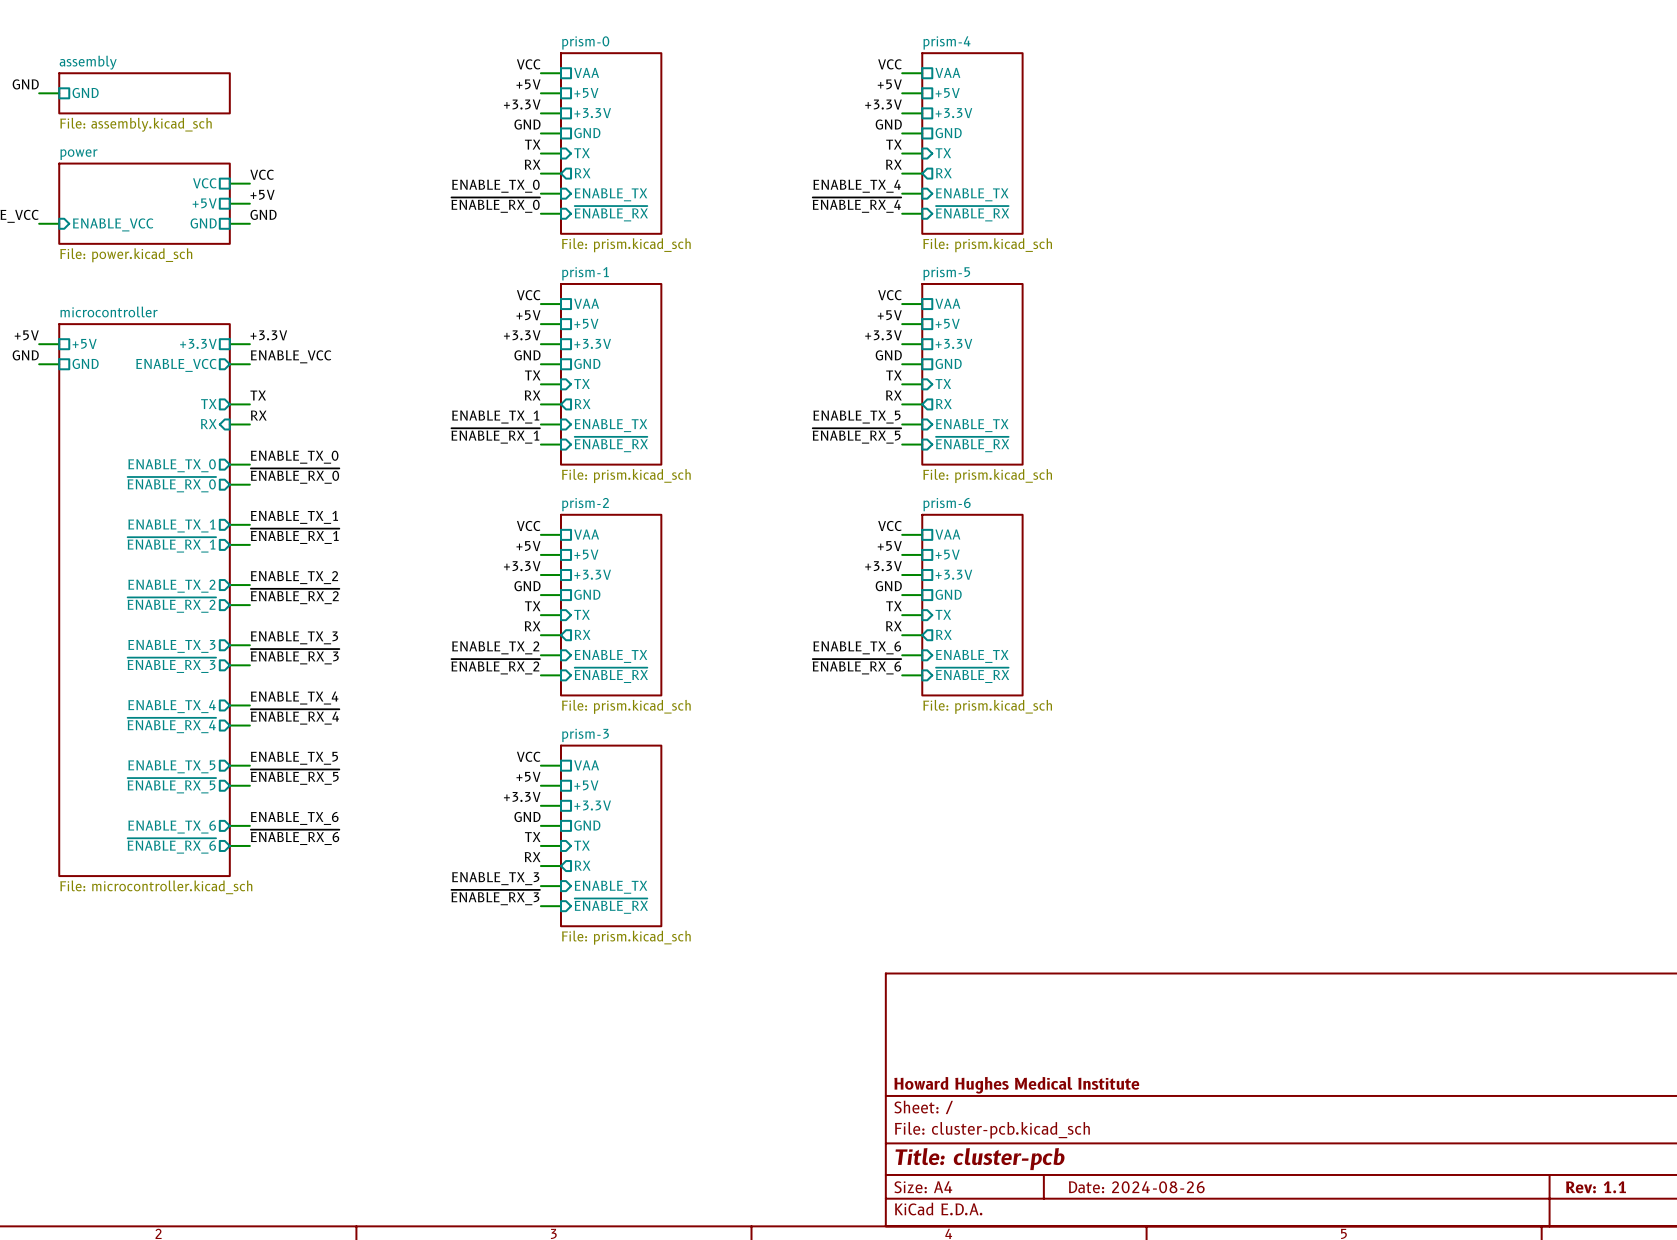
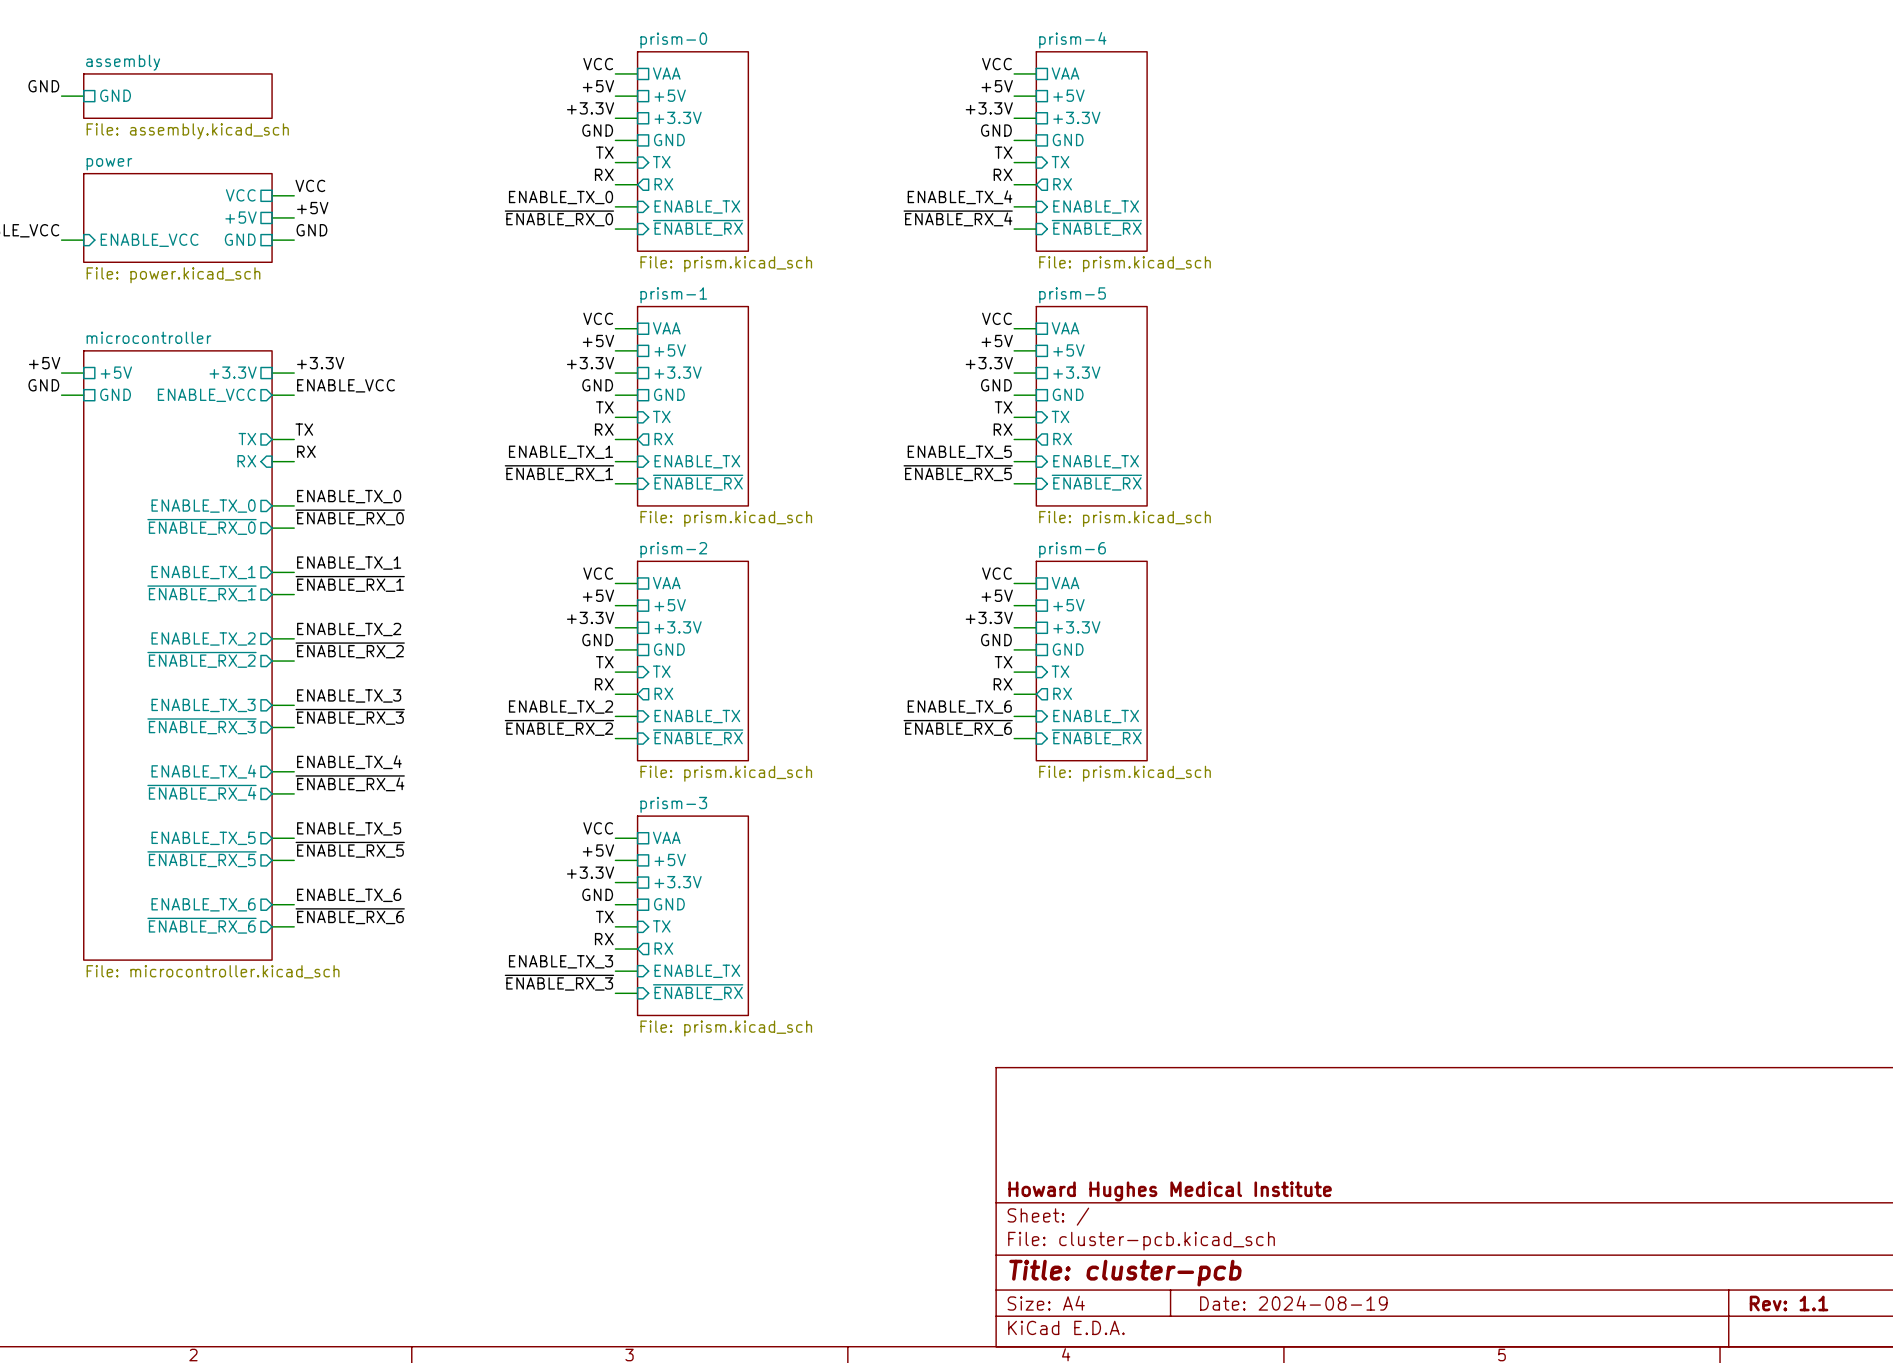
title block: Date: 2024-08-26 (1136, 1187) -> Date: 2024-08-19 (1293, 1303)

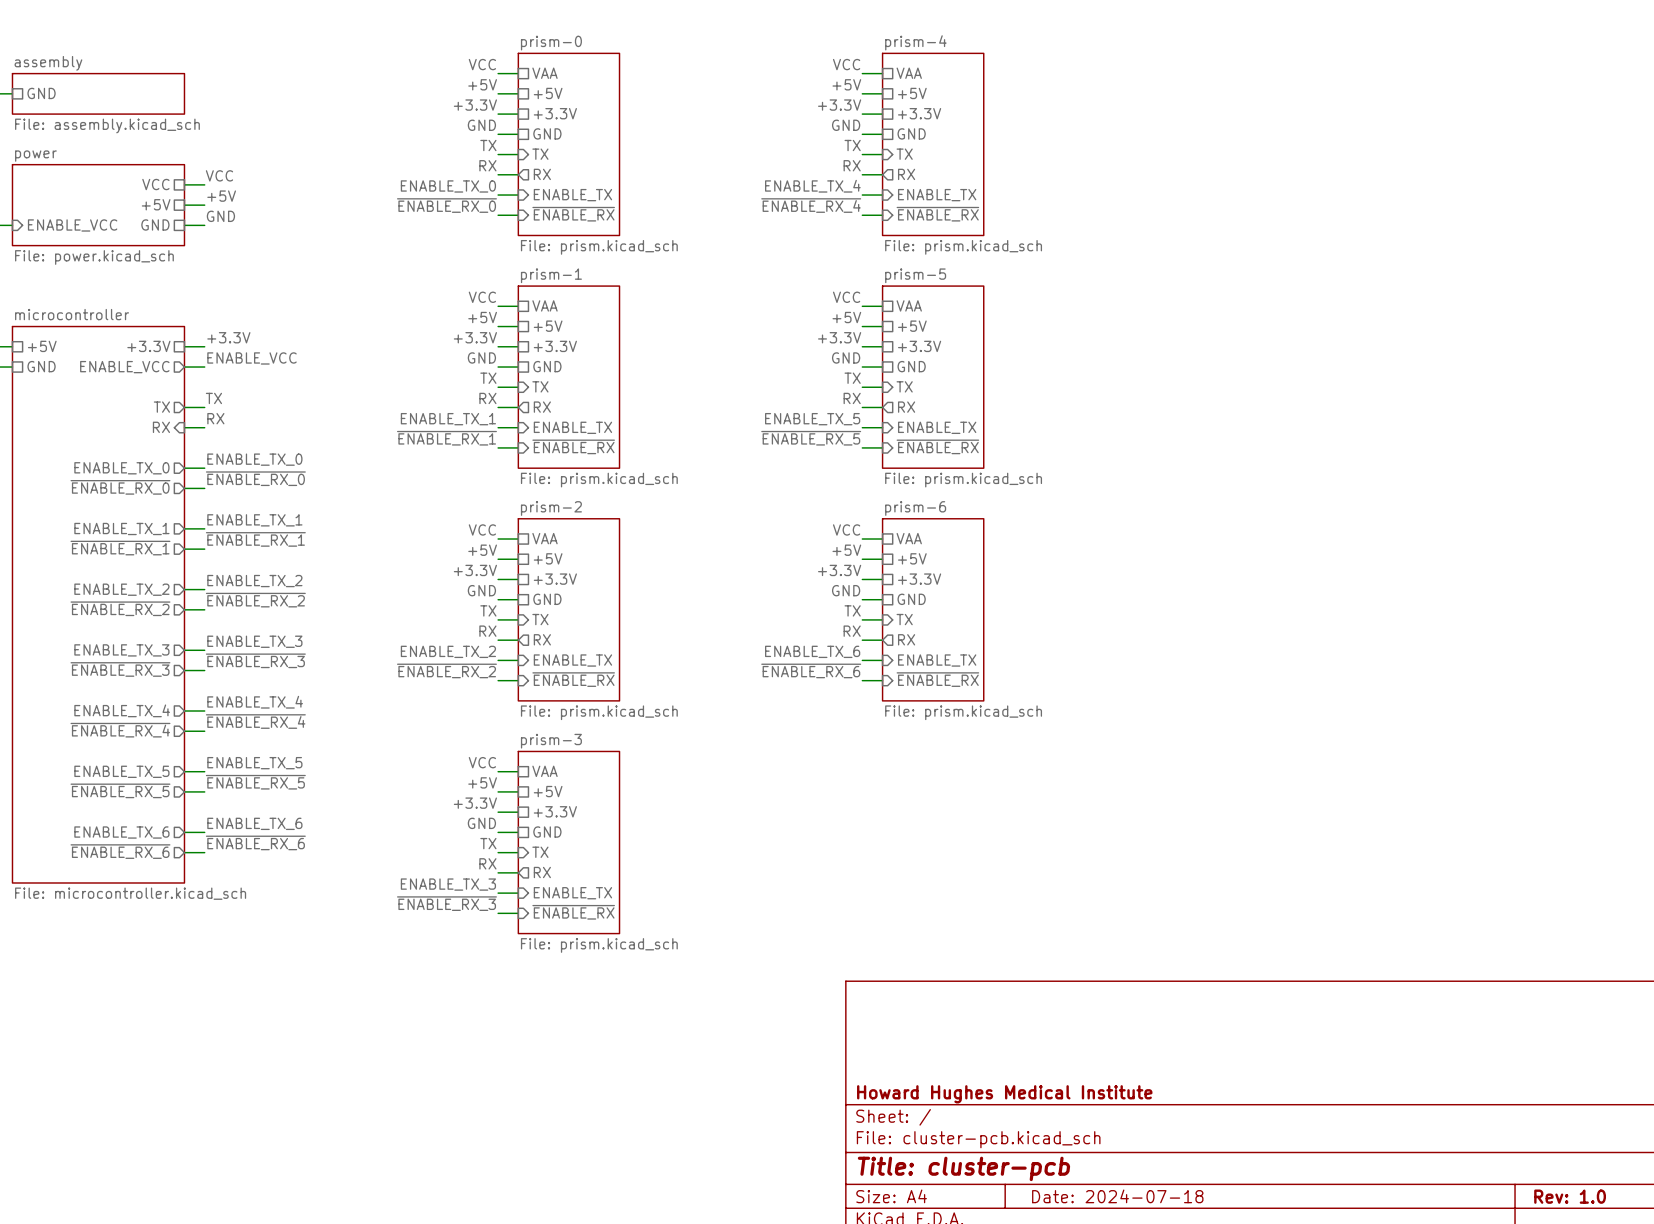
title block: Date: 2024-08-19 (1293, 1303) -> Date: 2024-07-18 (1117, 1196)
title block: Rev: 1.1 (1789, 1303) -> Rev: 1.0 (1570, 1196)

